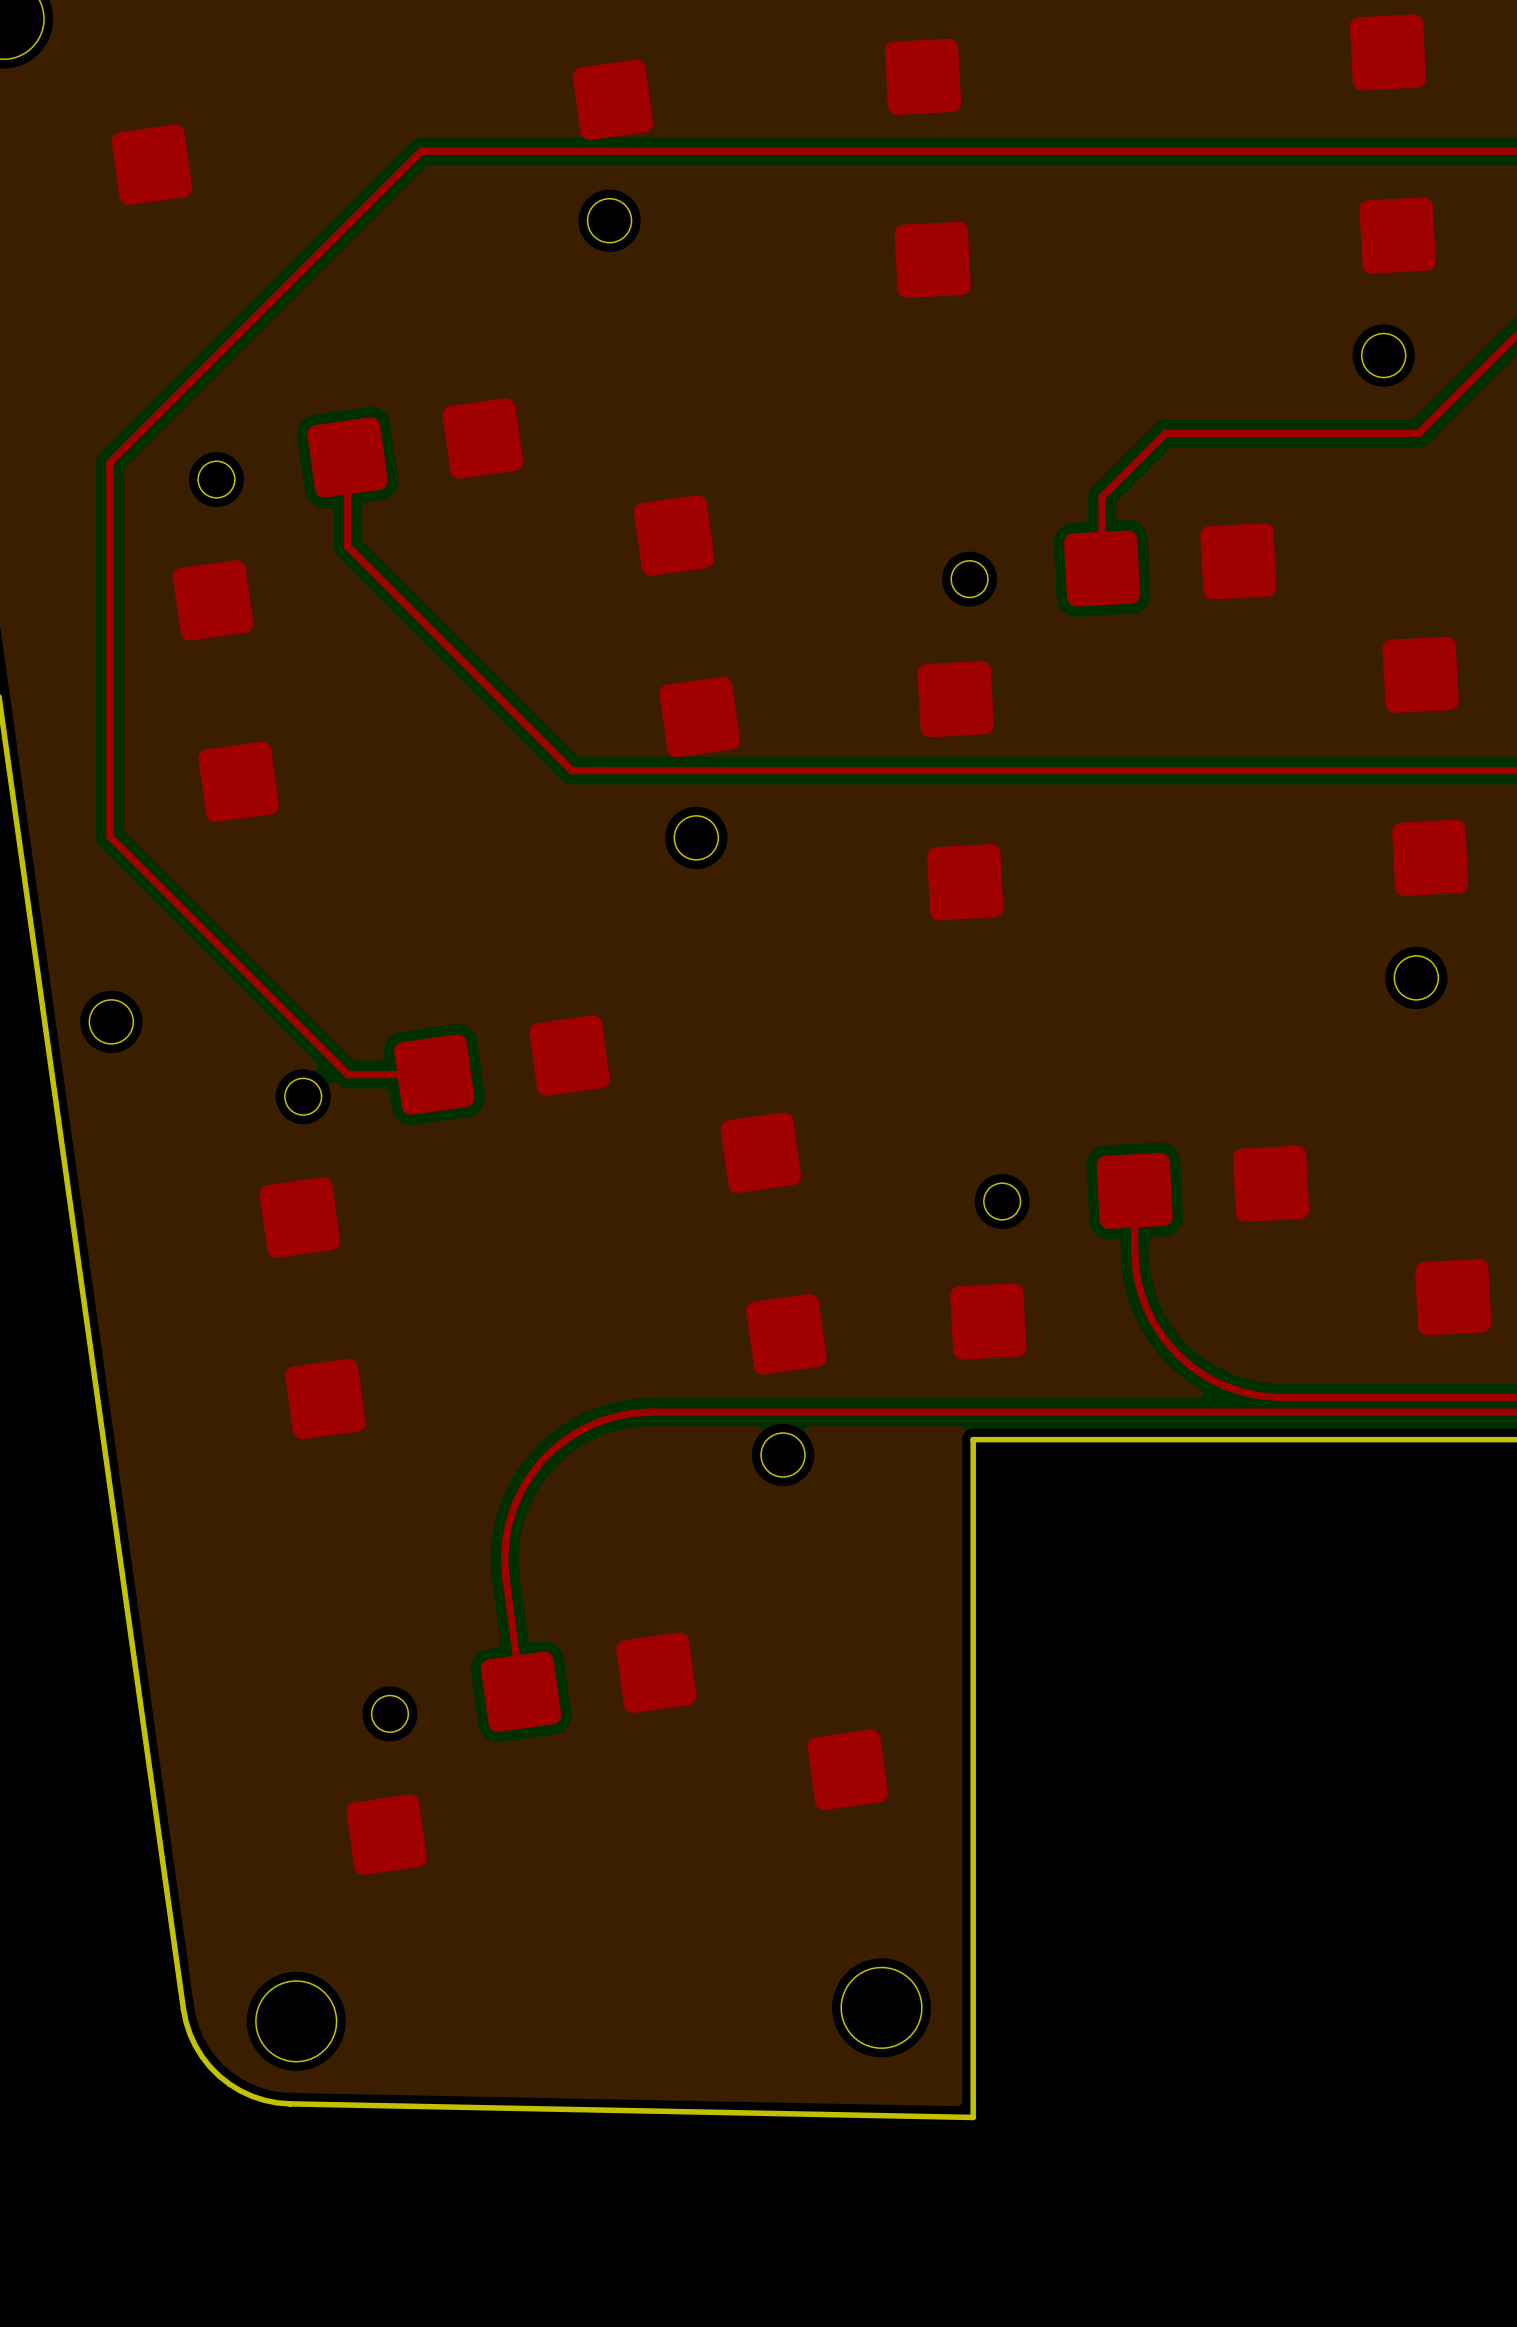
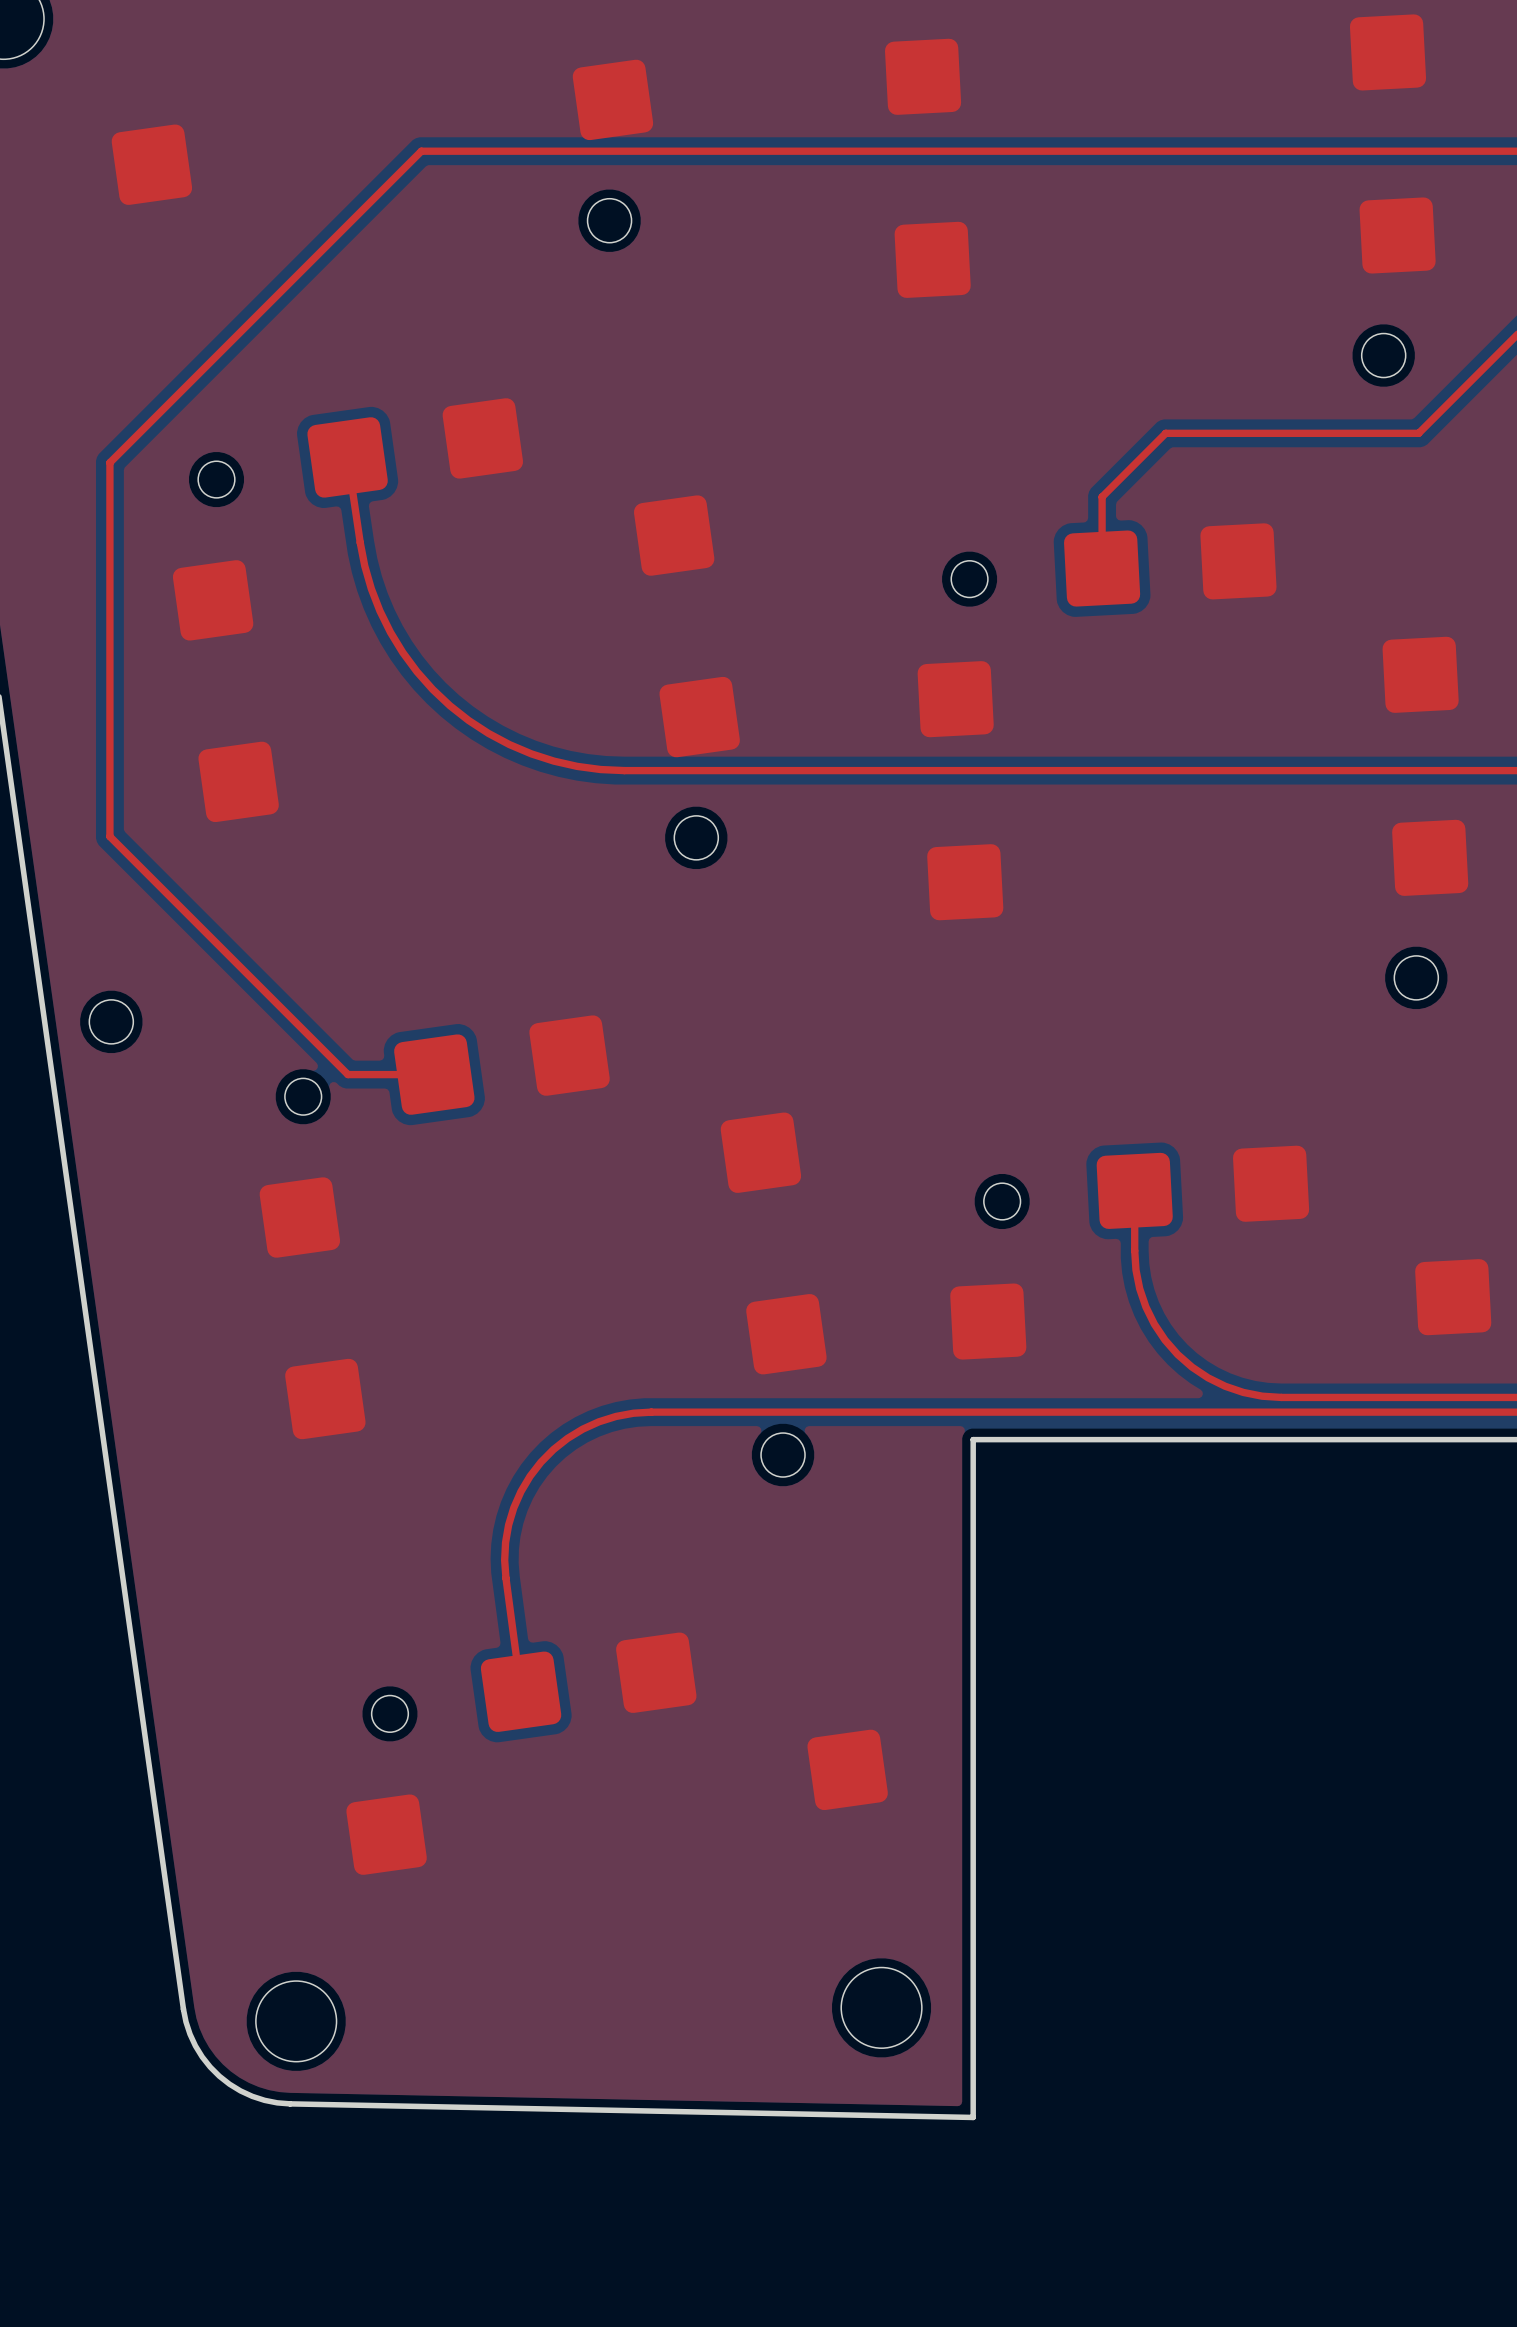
top track: (347, 457) (347, 546) (571, 770) (624, 770) -> (347, 457) (360, 542) (371, 588) (390, 632) (416, 671) (449, 705) (468, 720) (509, 744) (531, 753) (577, 766) (624, 770)

